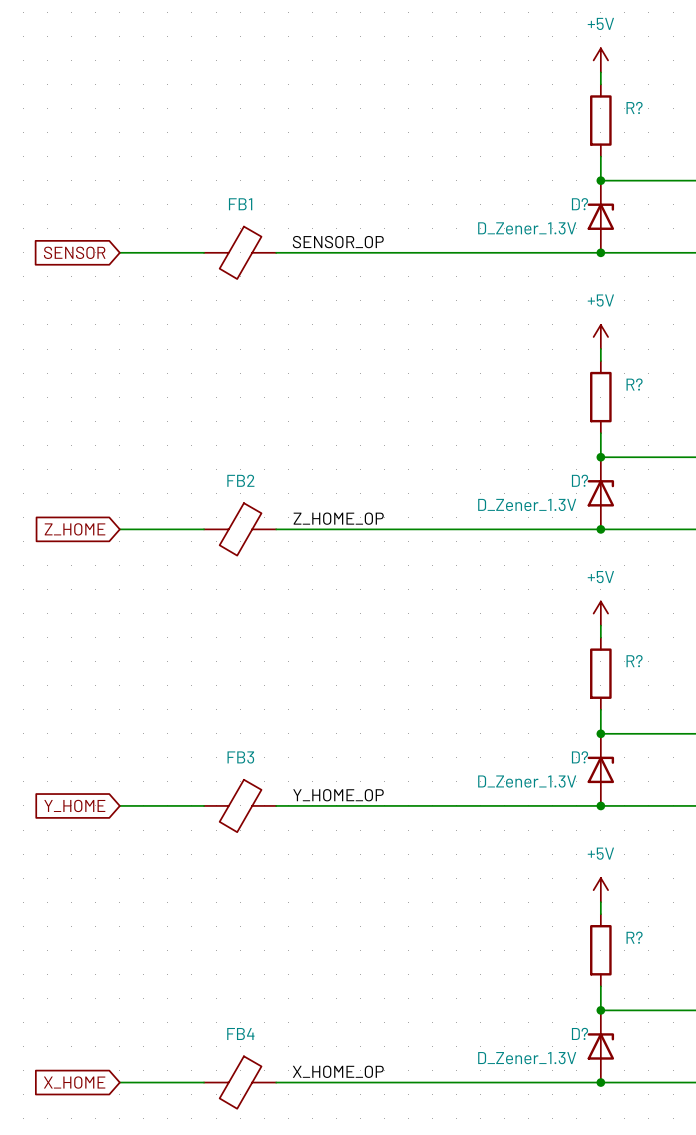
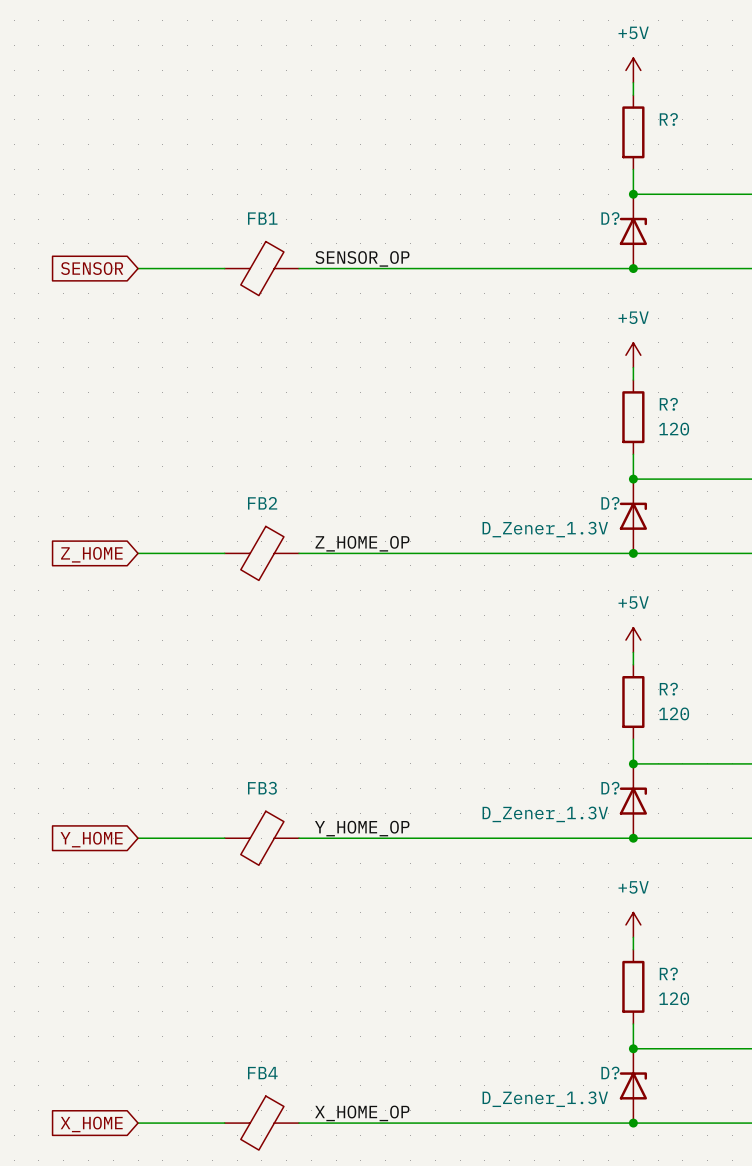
D? value: D_Zener_1.3V (527, 228) -> none
R? value: none -> 120 (674, 429)
R? value: none -> 120 (674, 713)
R? value: none -> 120 (674, 998)

